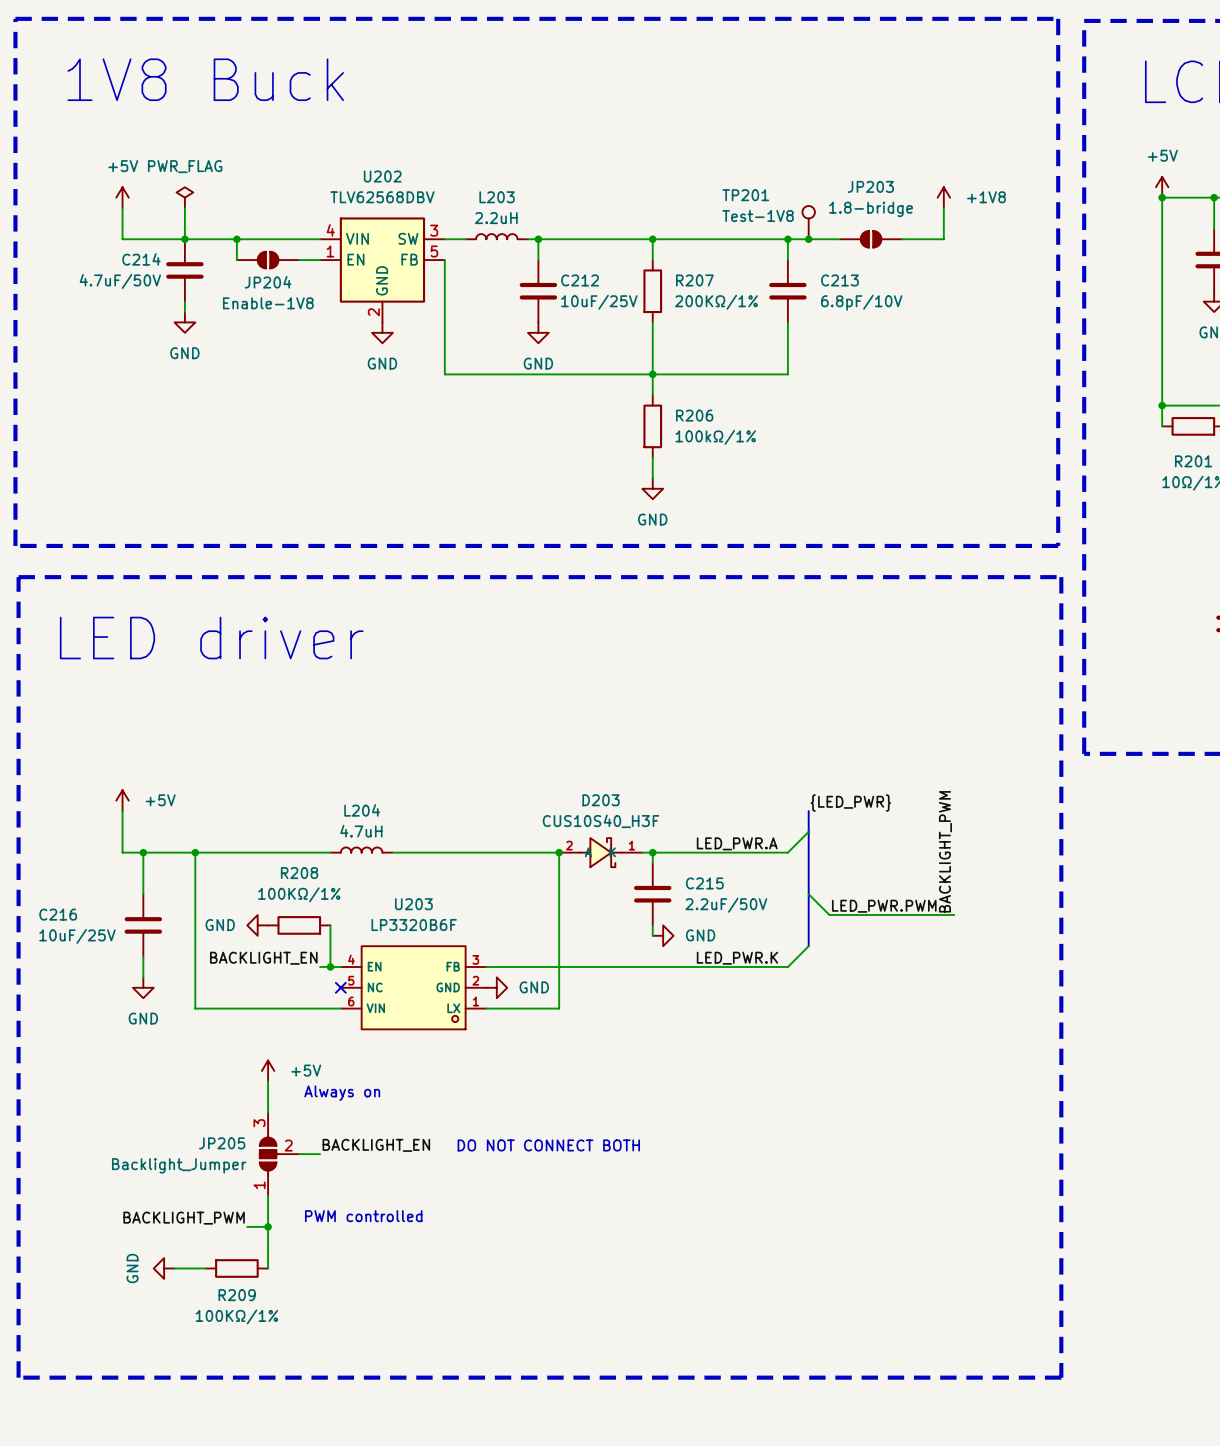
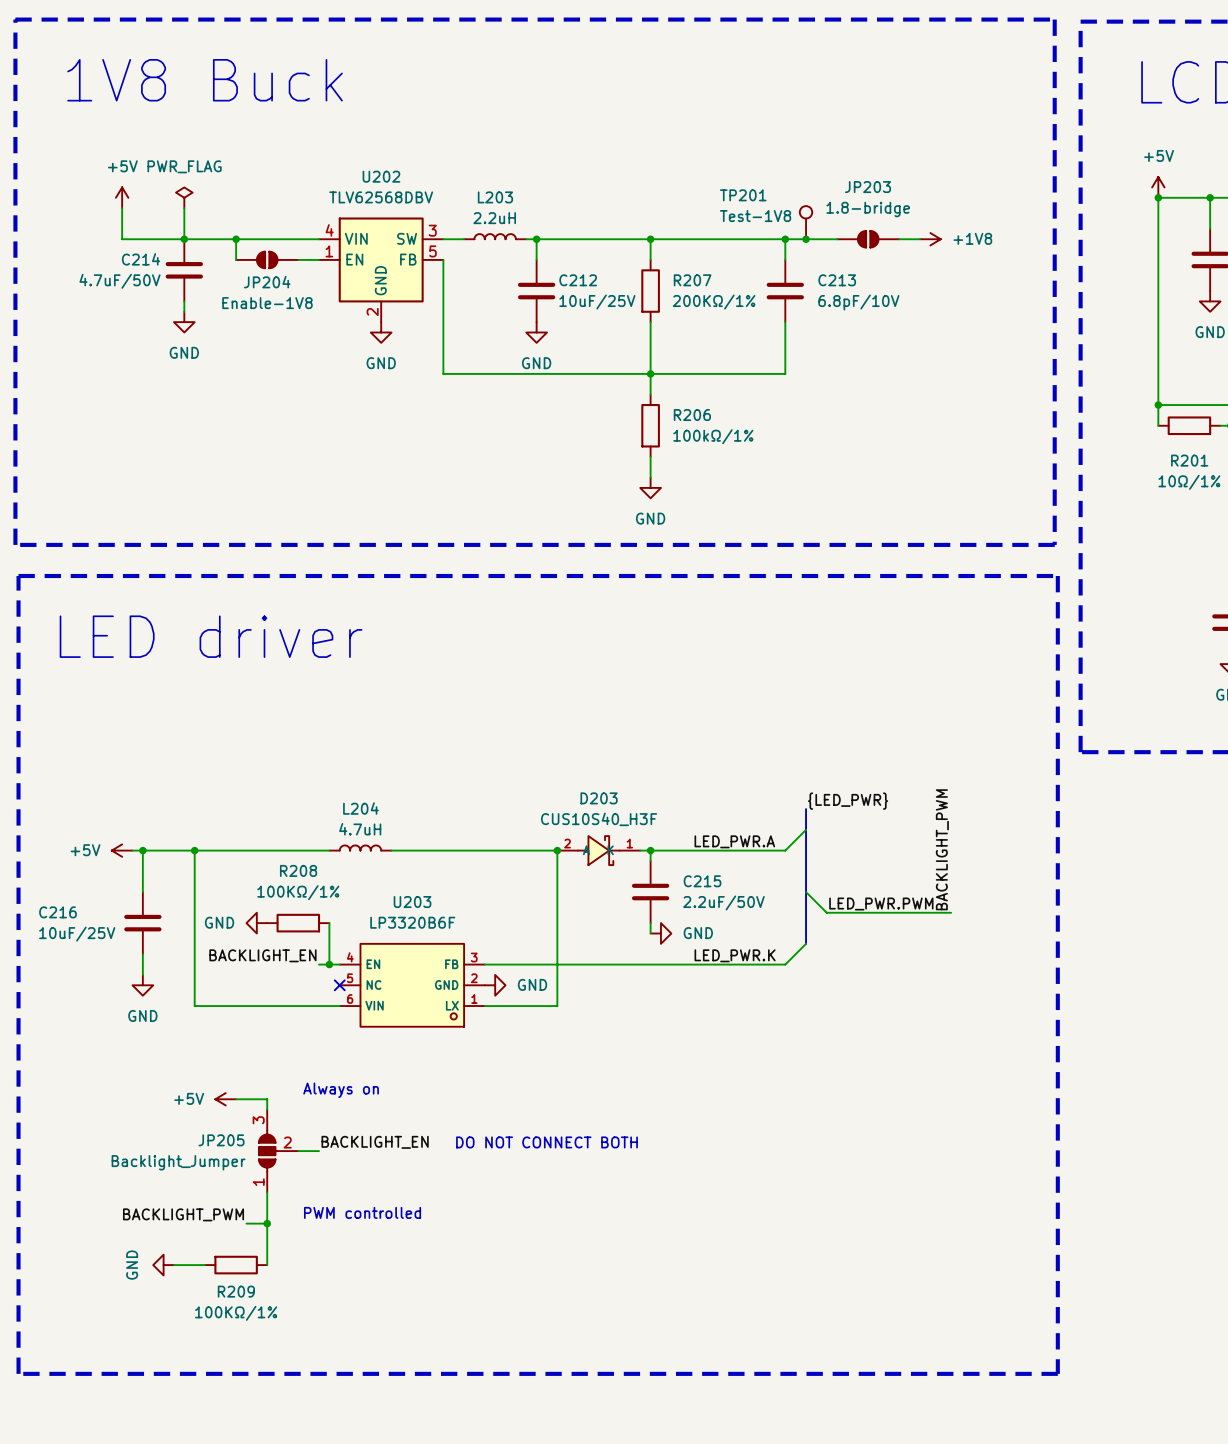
power symbol rotation: 0° (943, 197) -> 90° clockwise (930, 239)
power symbol position: +1V8 (943, 197) -> +1V8 (930, 239)
wire: (943, 208) (943, 239) (923, 239) -> none
power symbol rotation: 0° (122, 800) -> 90° counterclockwise (122, 850)
power symbol position: +5V (122, 800) -> +5V (122, 850)
power symbol text position: +5V (160, 800) -> +5V (85, 850)
wire: (122, 811) (122, 852) (132, 852) -> none
power symbol rotation: 0° (268, 1070) -> 90° counterclockwise (225, 1099)
power symbol position: +5V (268, 1070) -> +5V (225, 1099)
power symbol text position: +5V (306, 1070) -> +5V (189, 1098)
wire: (268, 1081) (268, 1102) -> (236, 1099) (267, 1099)

